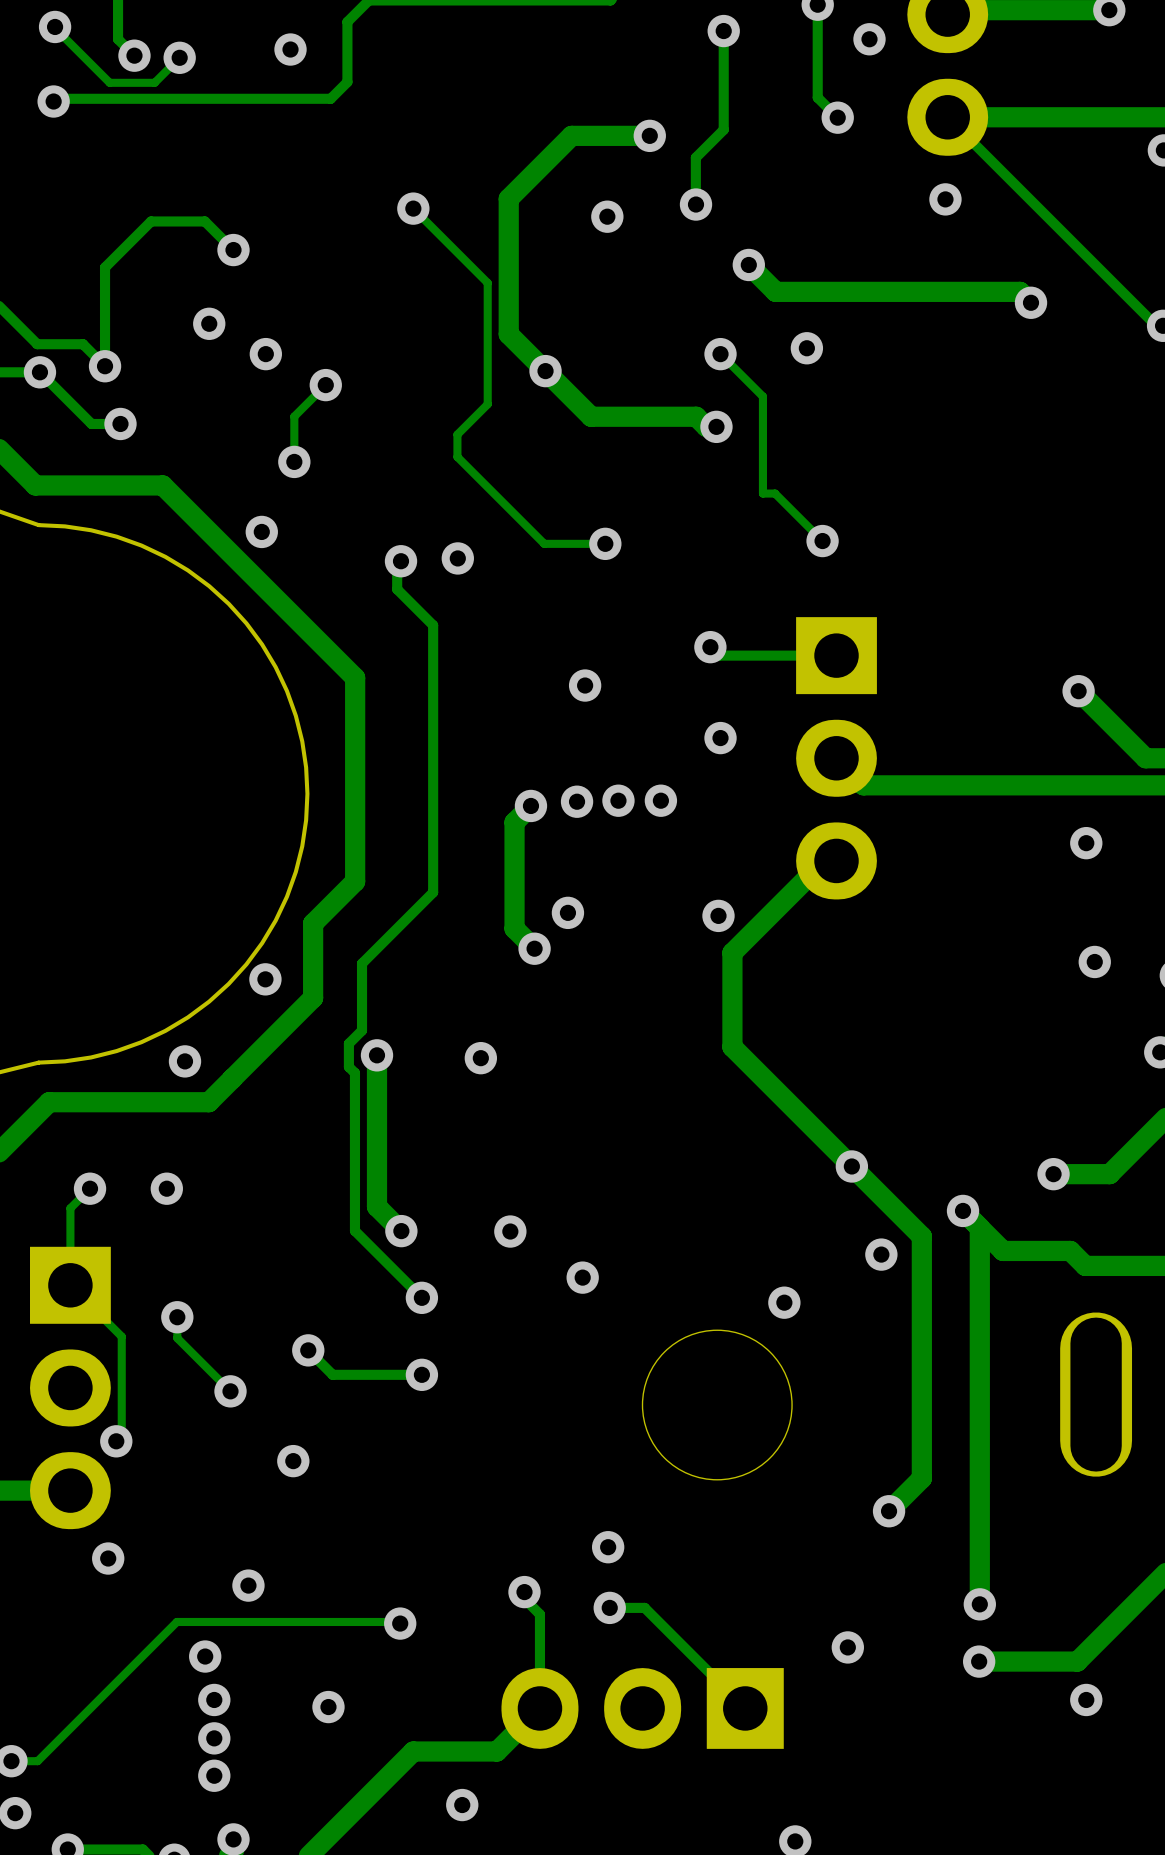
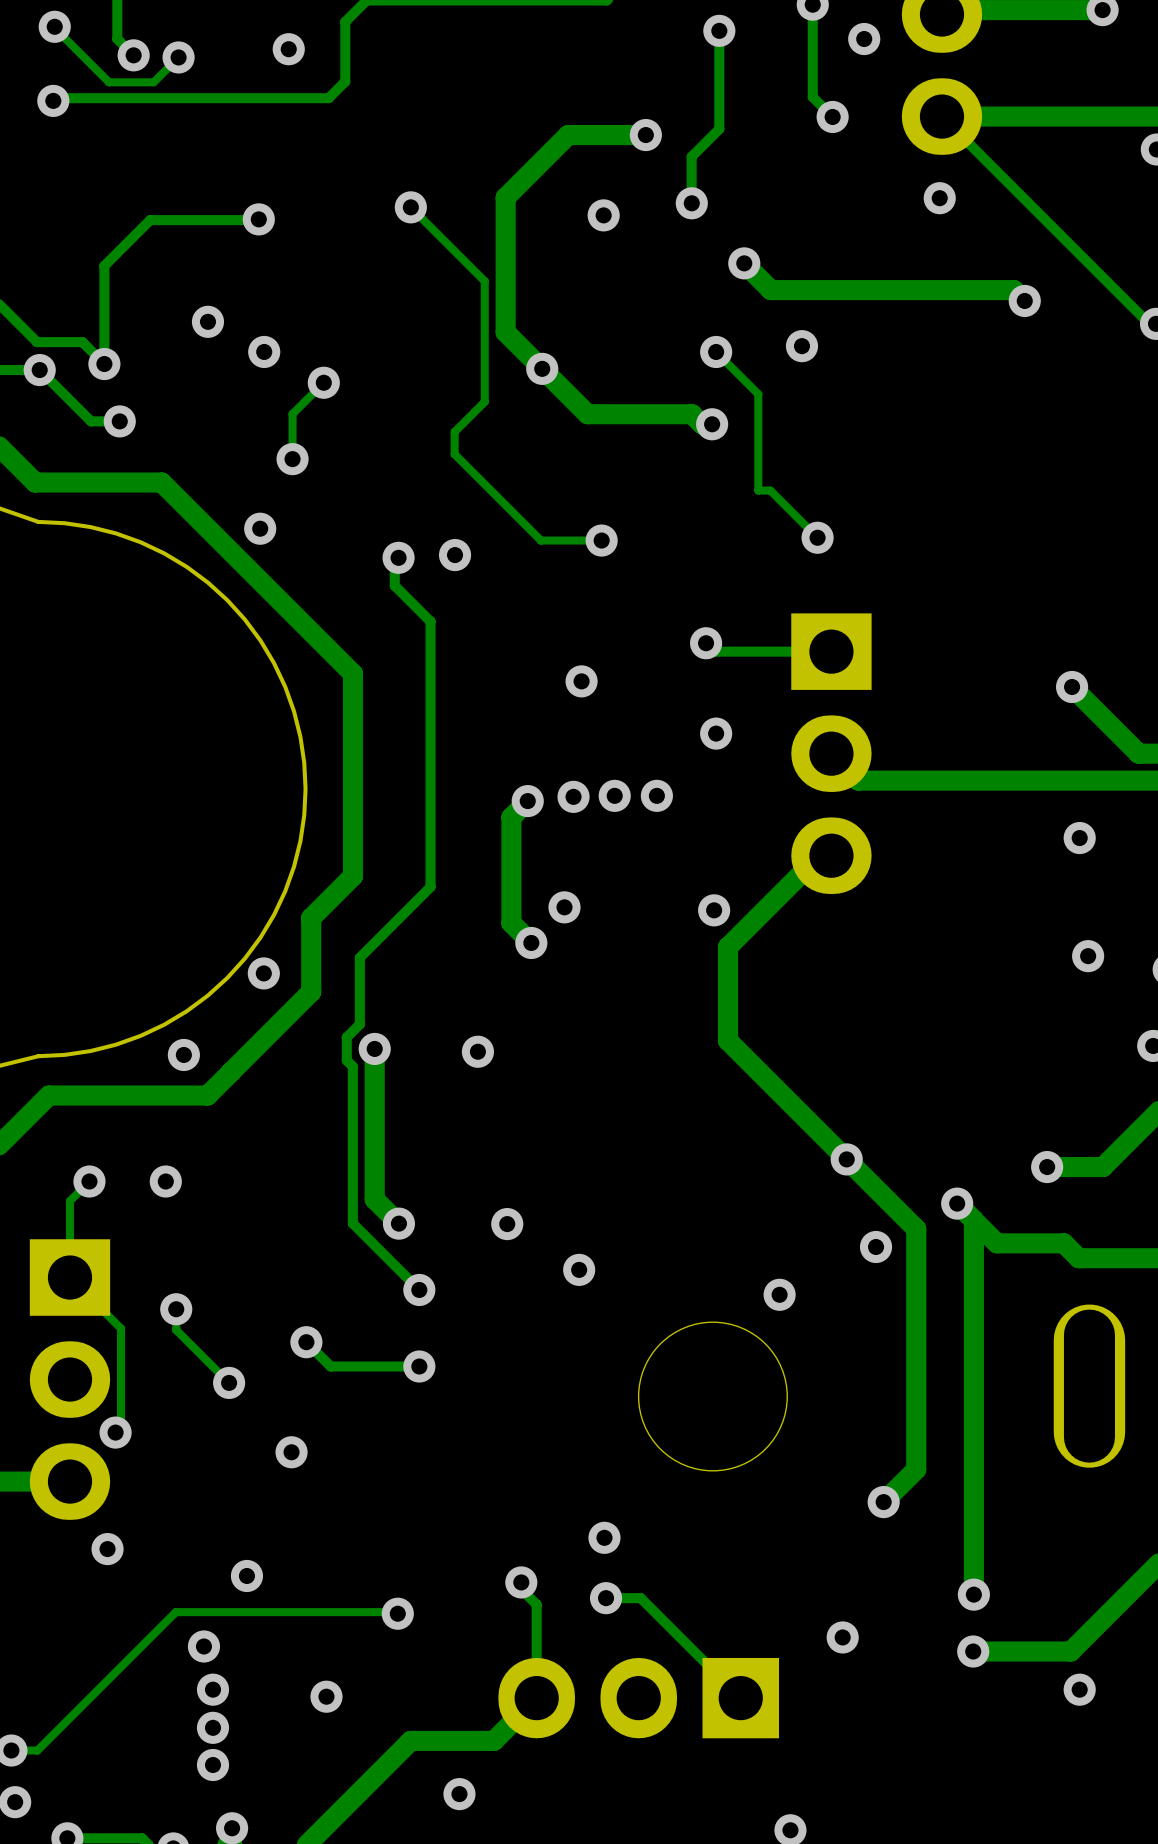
track: (204, 221) (233, 250) -> (203, 220) (258, 219)
via position: (233, 250) -> (258, 219)

